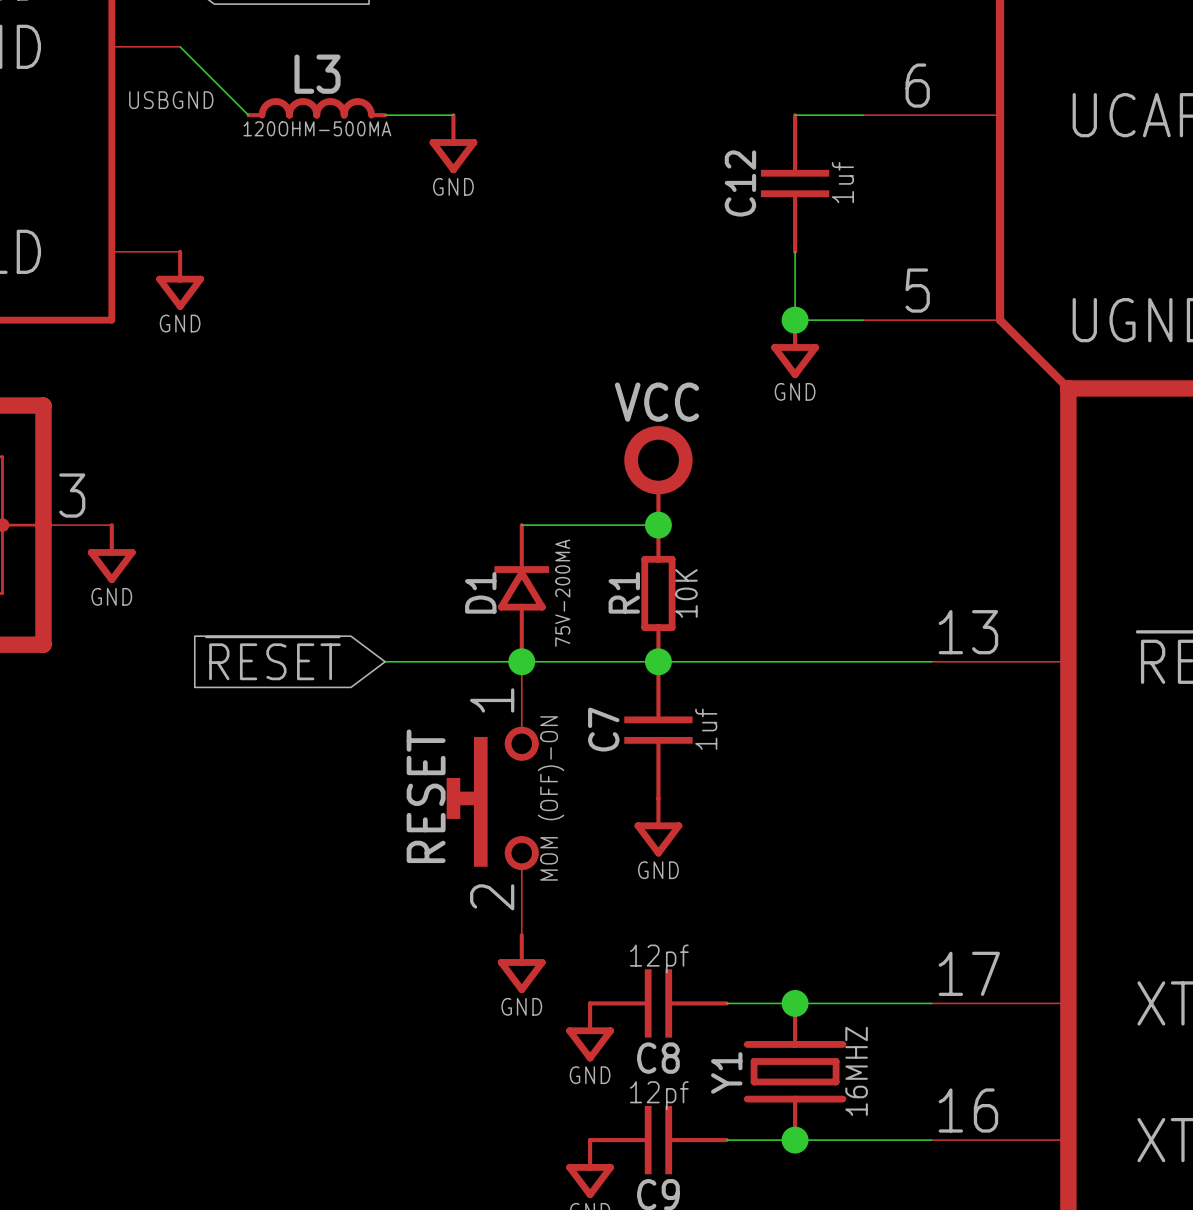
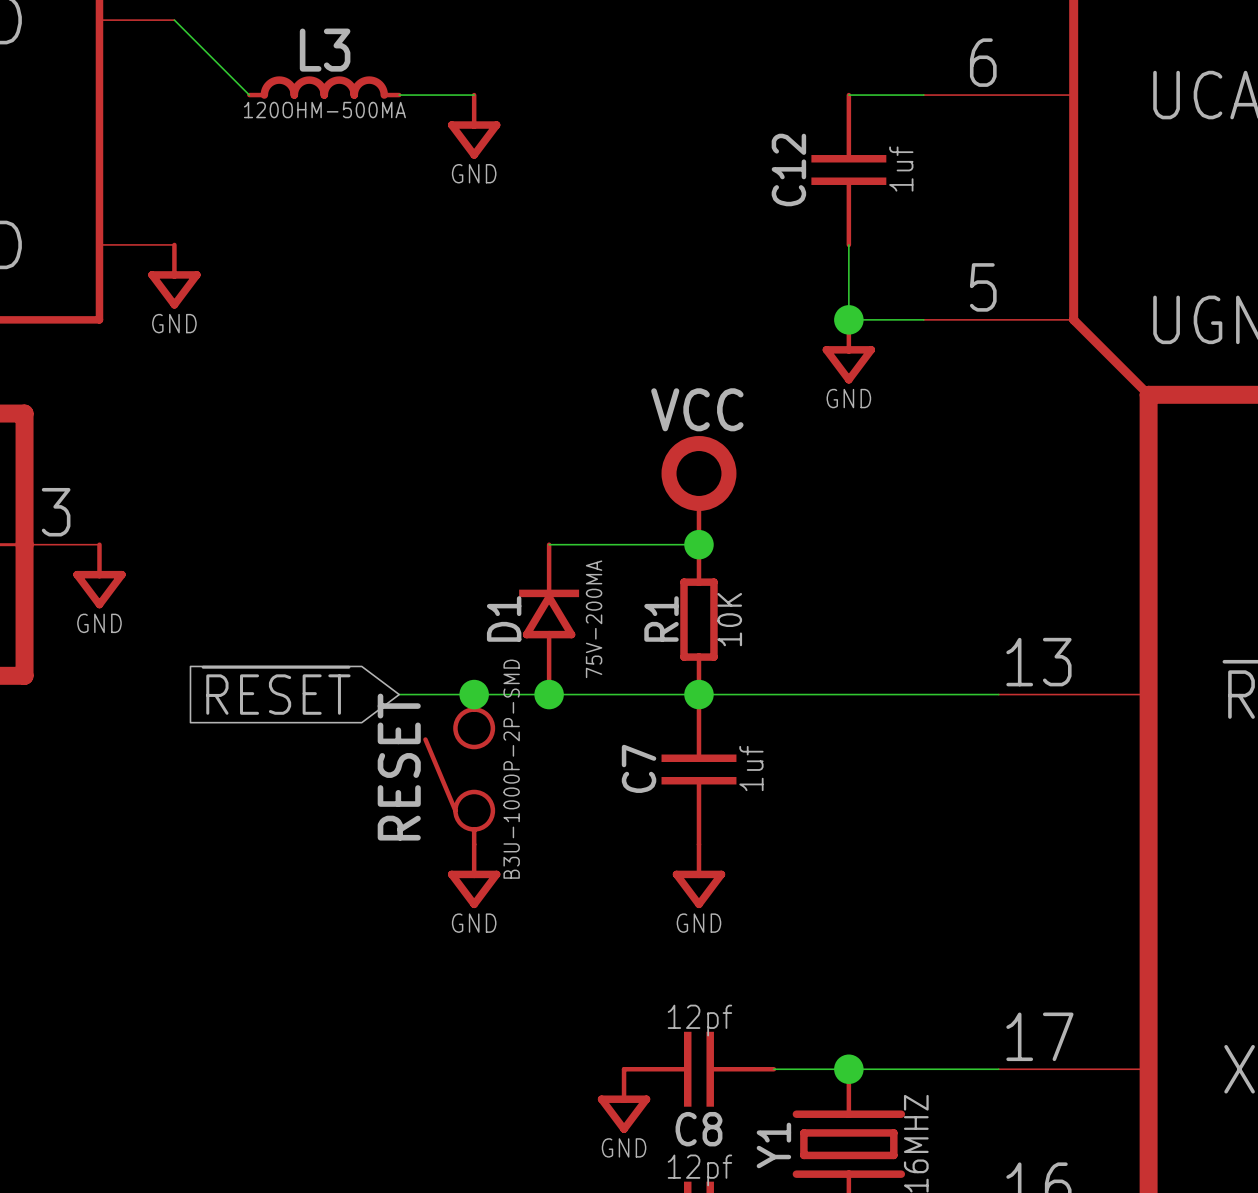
label: USBGND (171, 100) -> none
junction: none -> (474, 694)
RESET: none -> B3U-1000P-2P-SMD (459, 769)
RESET: MOM (OFF)-ON (492, 798) -> none
power symbol position: GND (521, 963) -> GND (474, 875)

